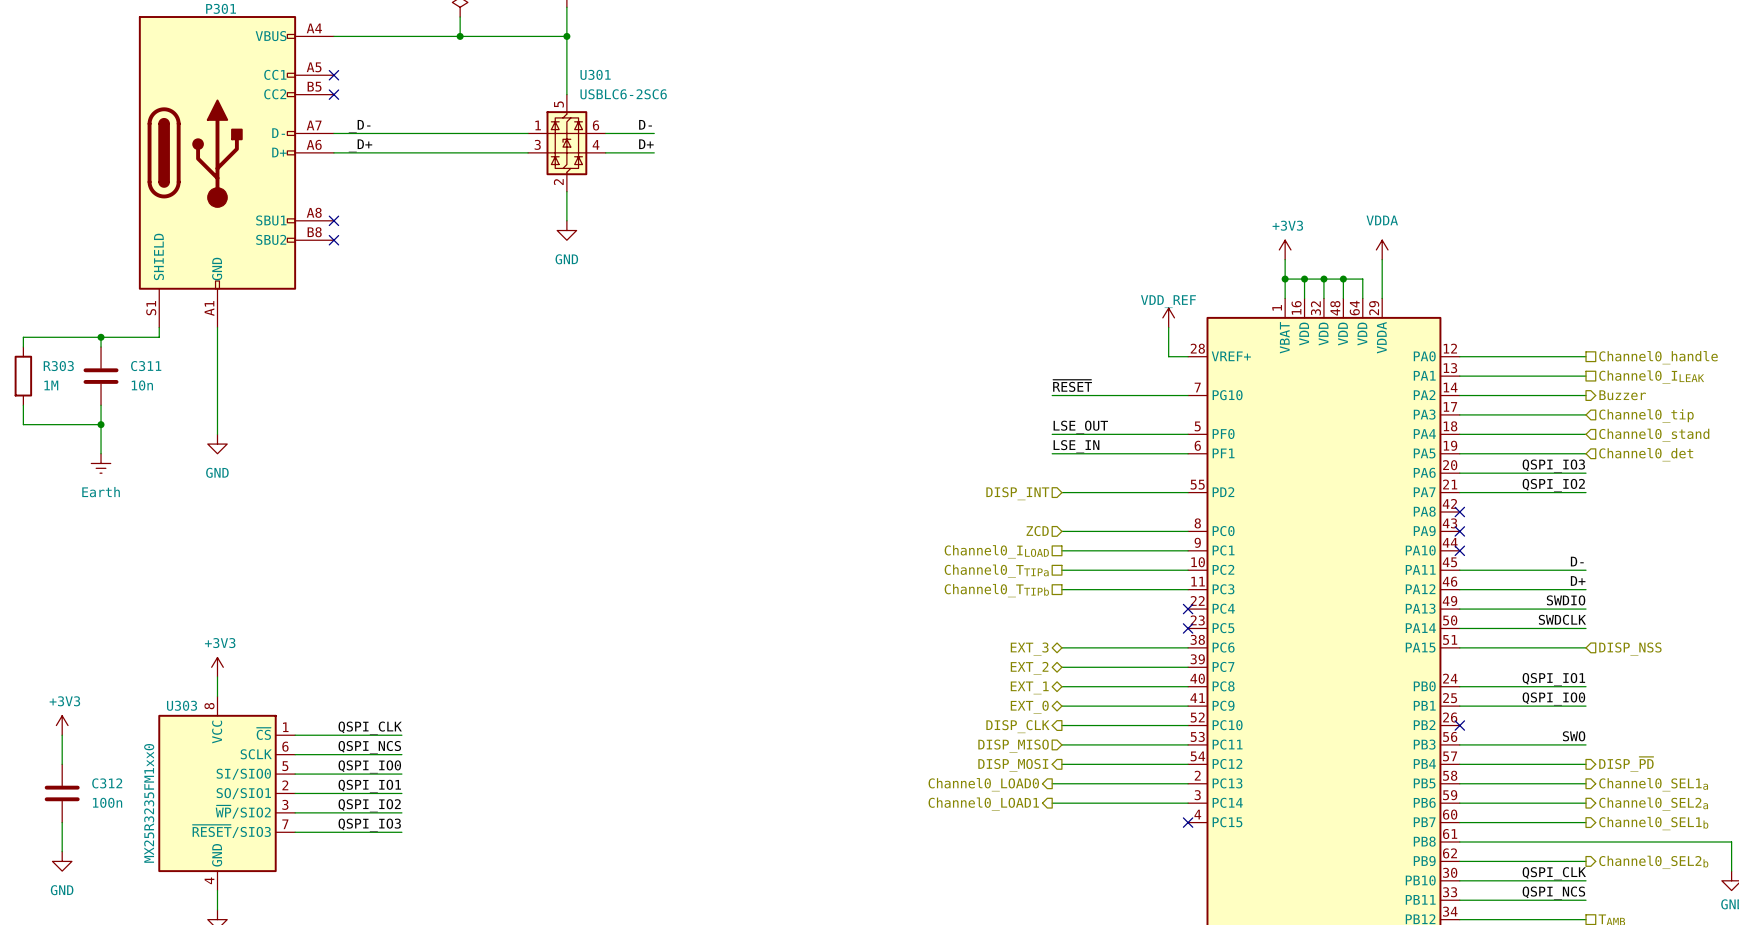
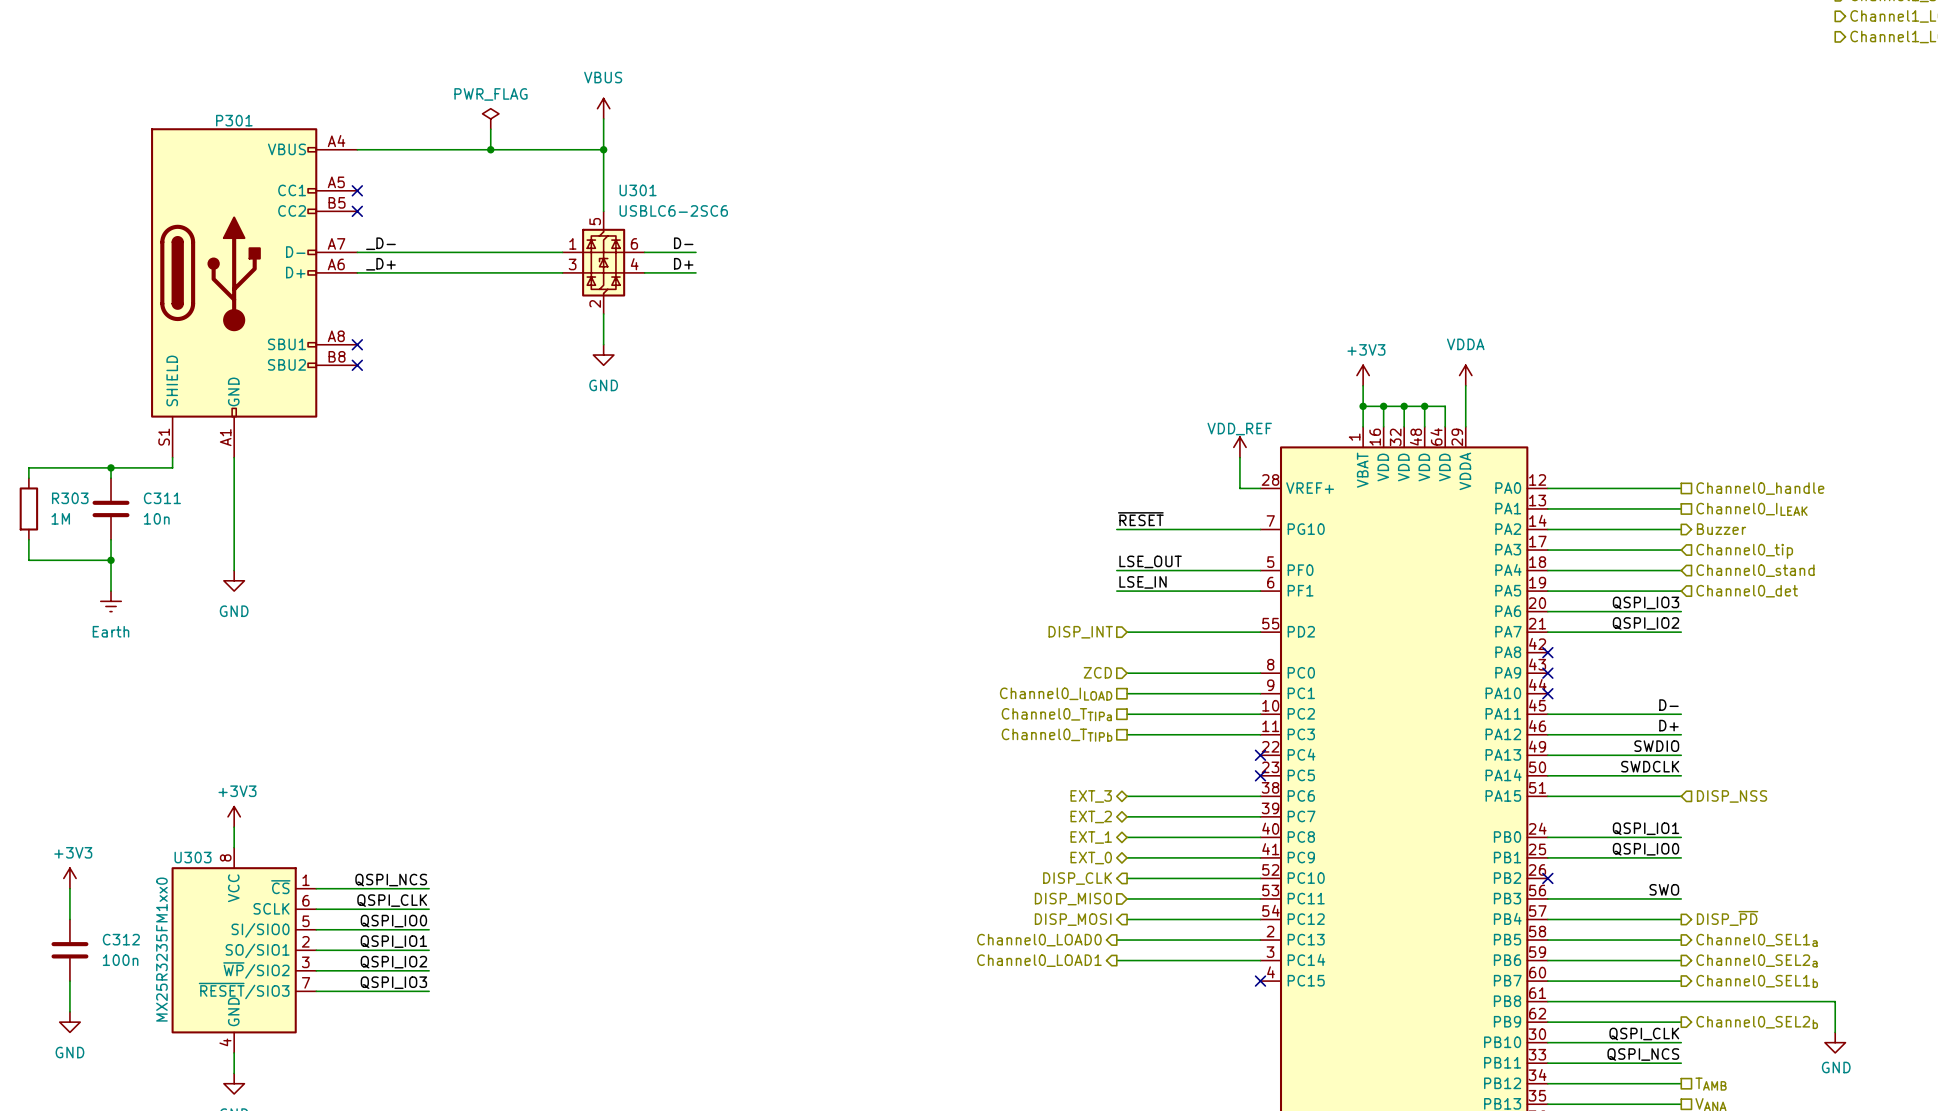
label: QSPI_CLK (370, 728) -> QSPI_NCS (391, 880)
label: QSPI_NCS (369, 747) -> QSPI_CLK (392, 900)

